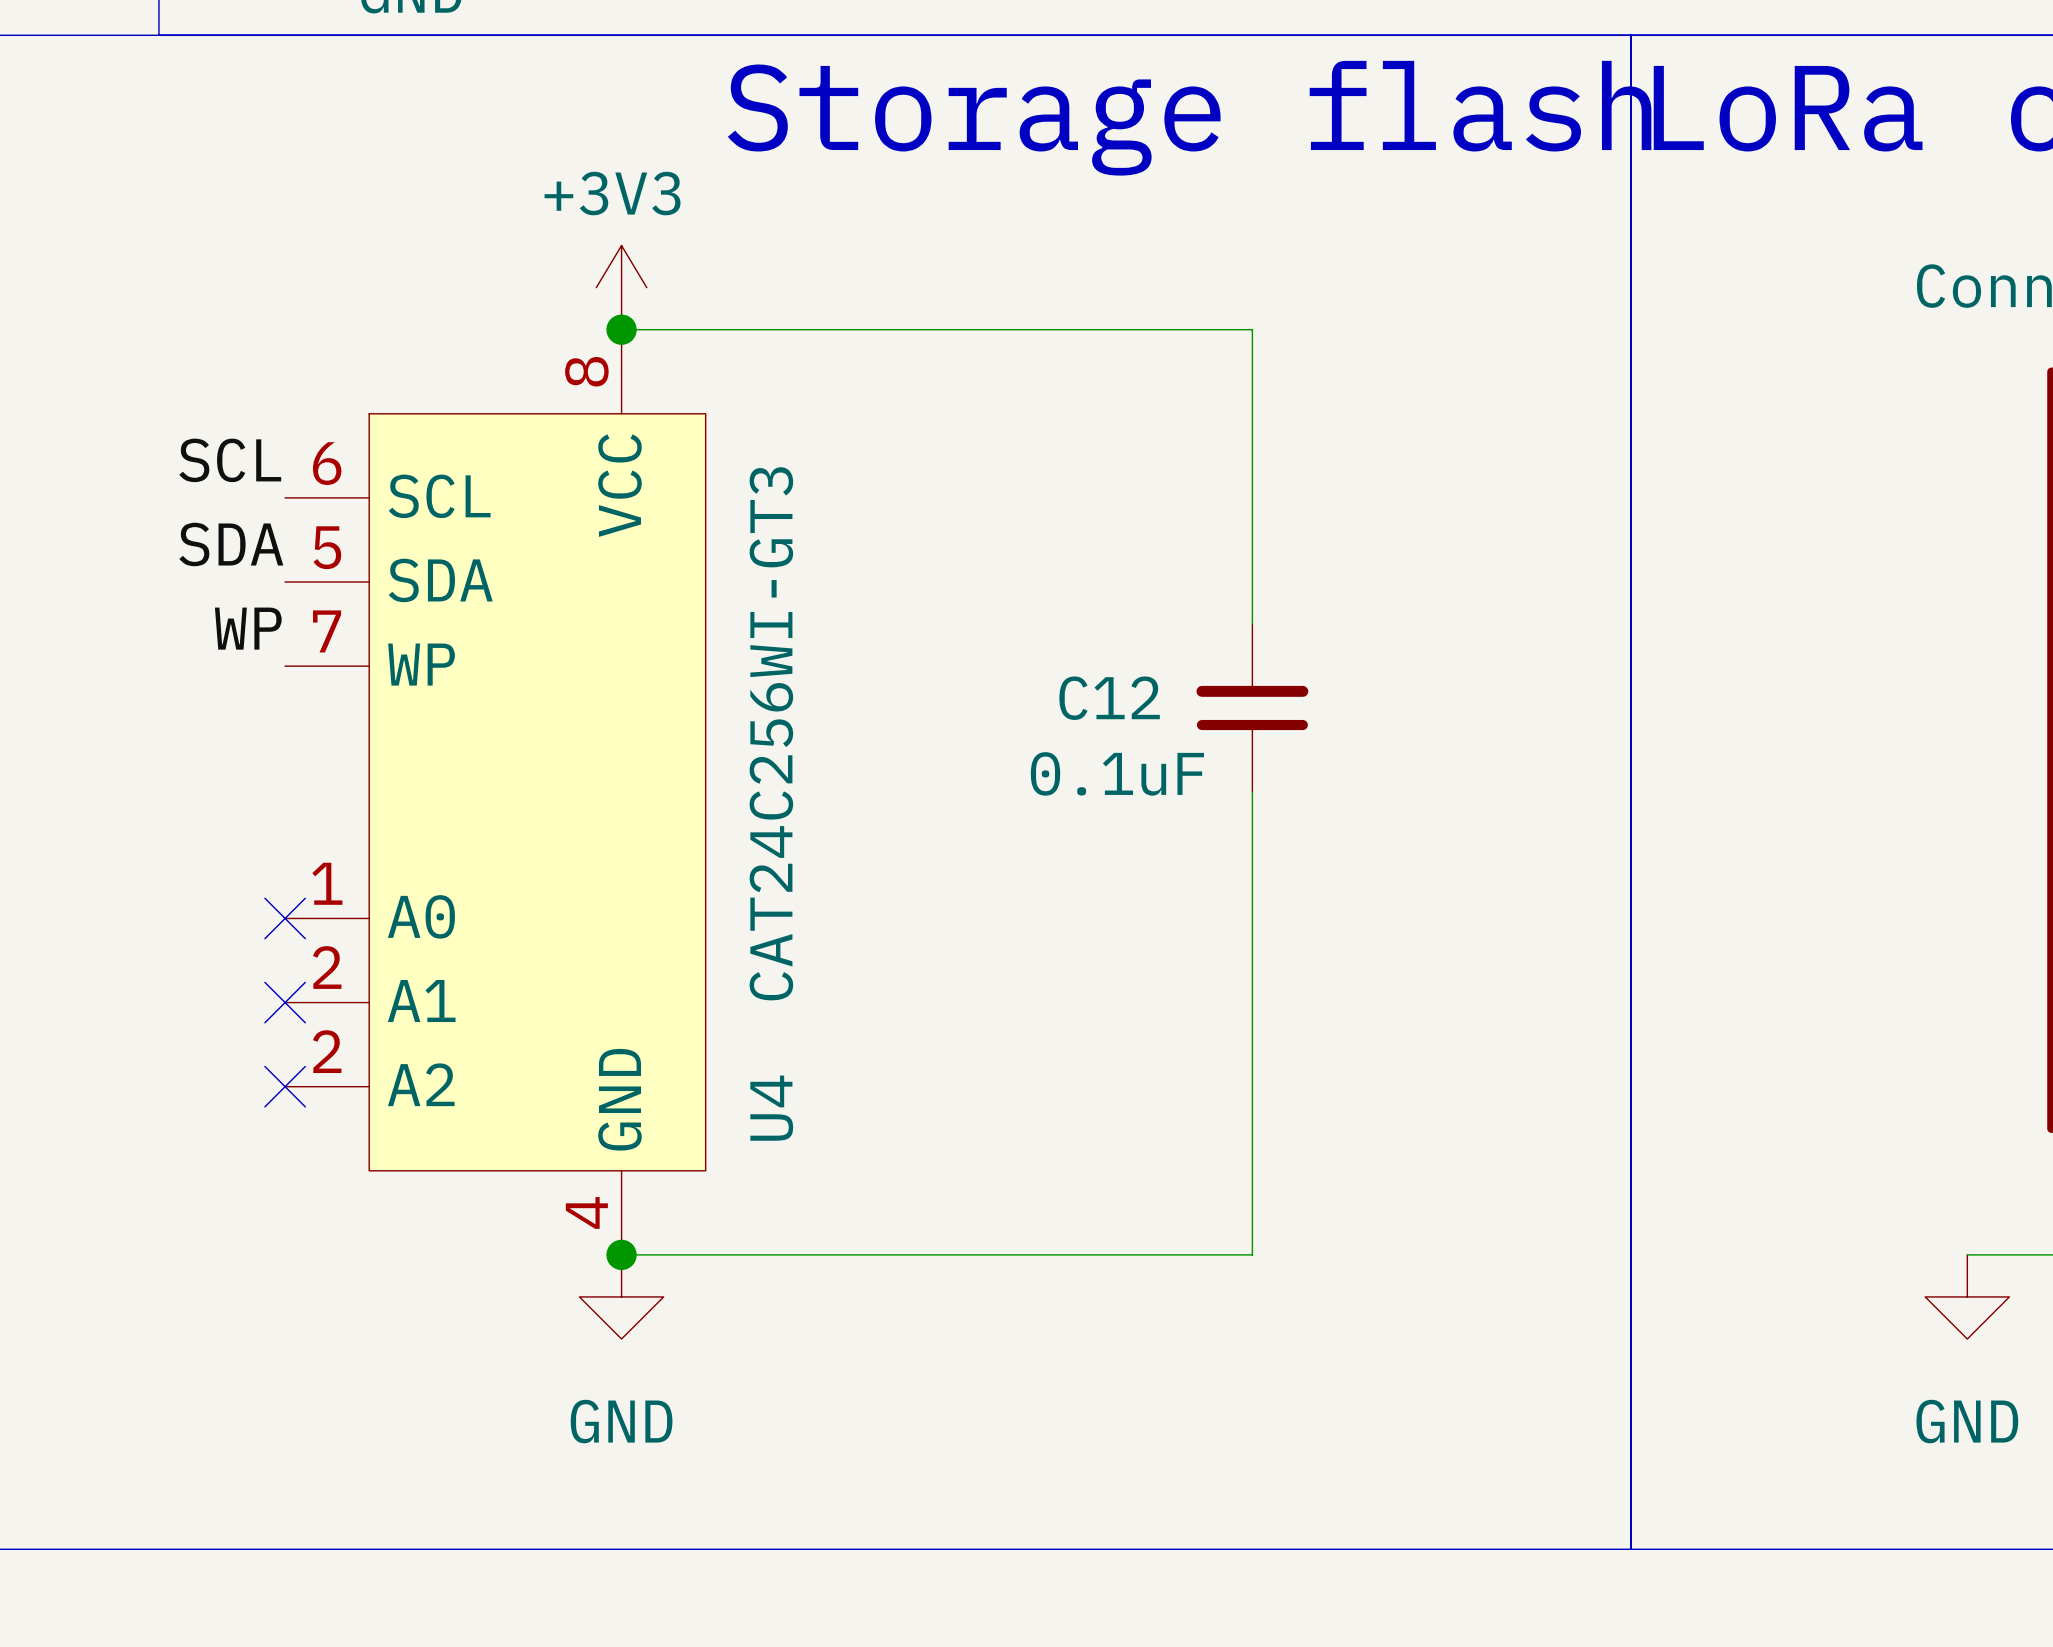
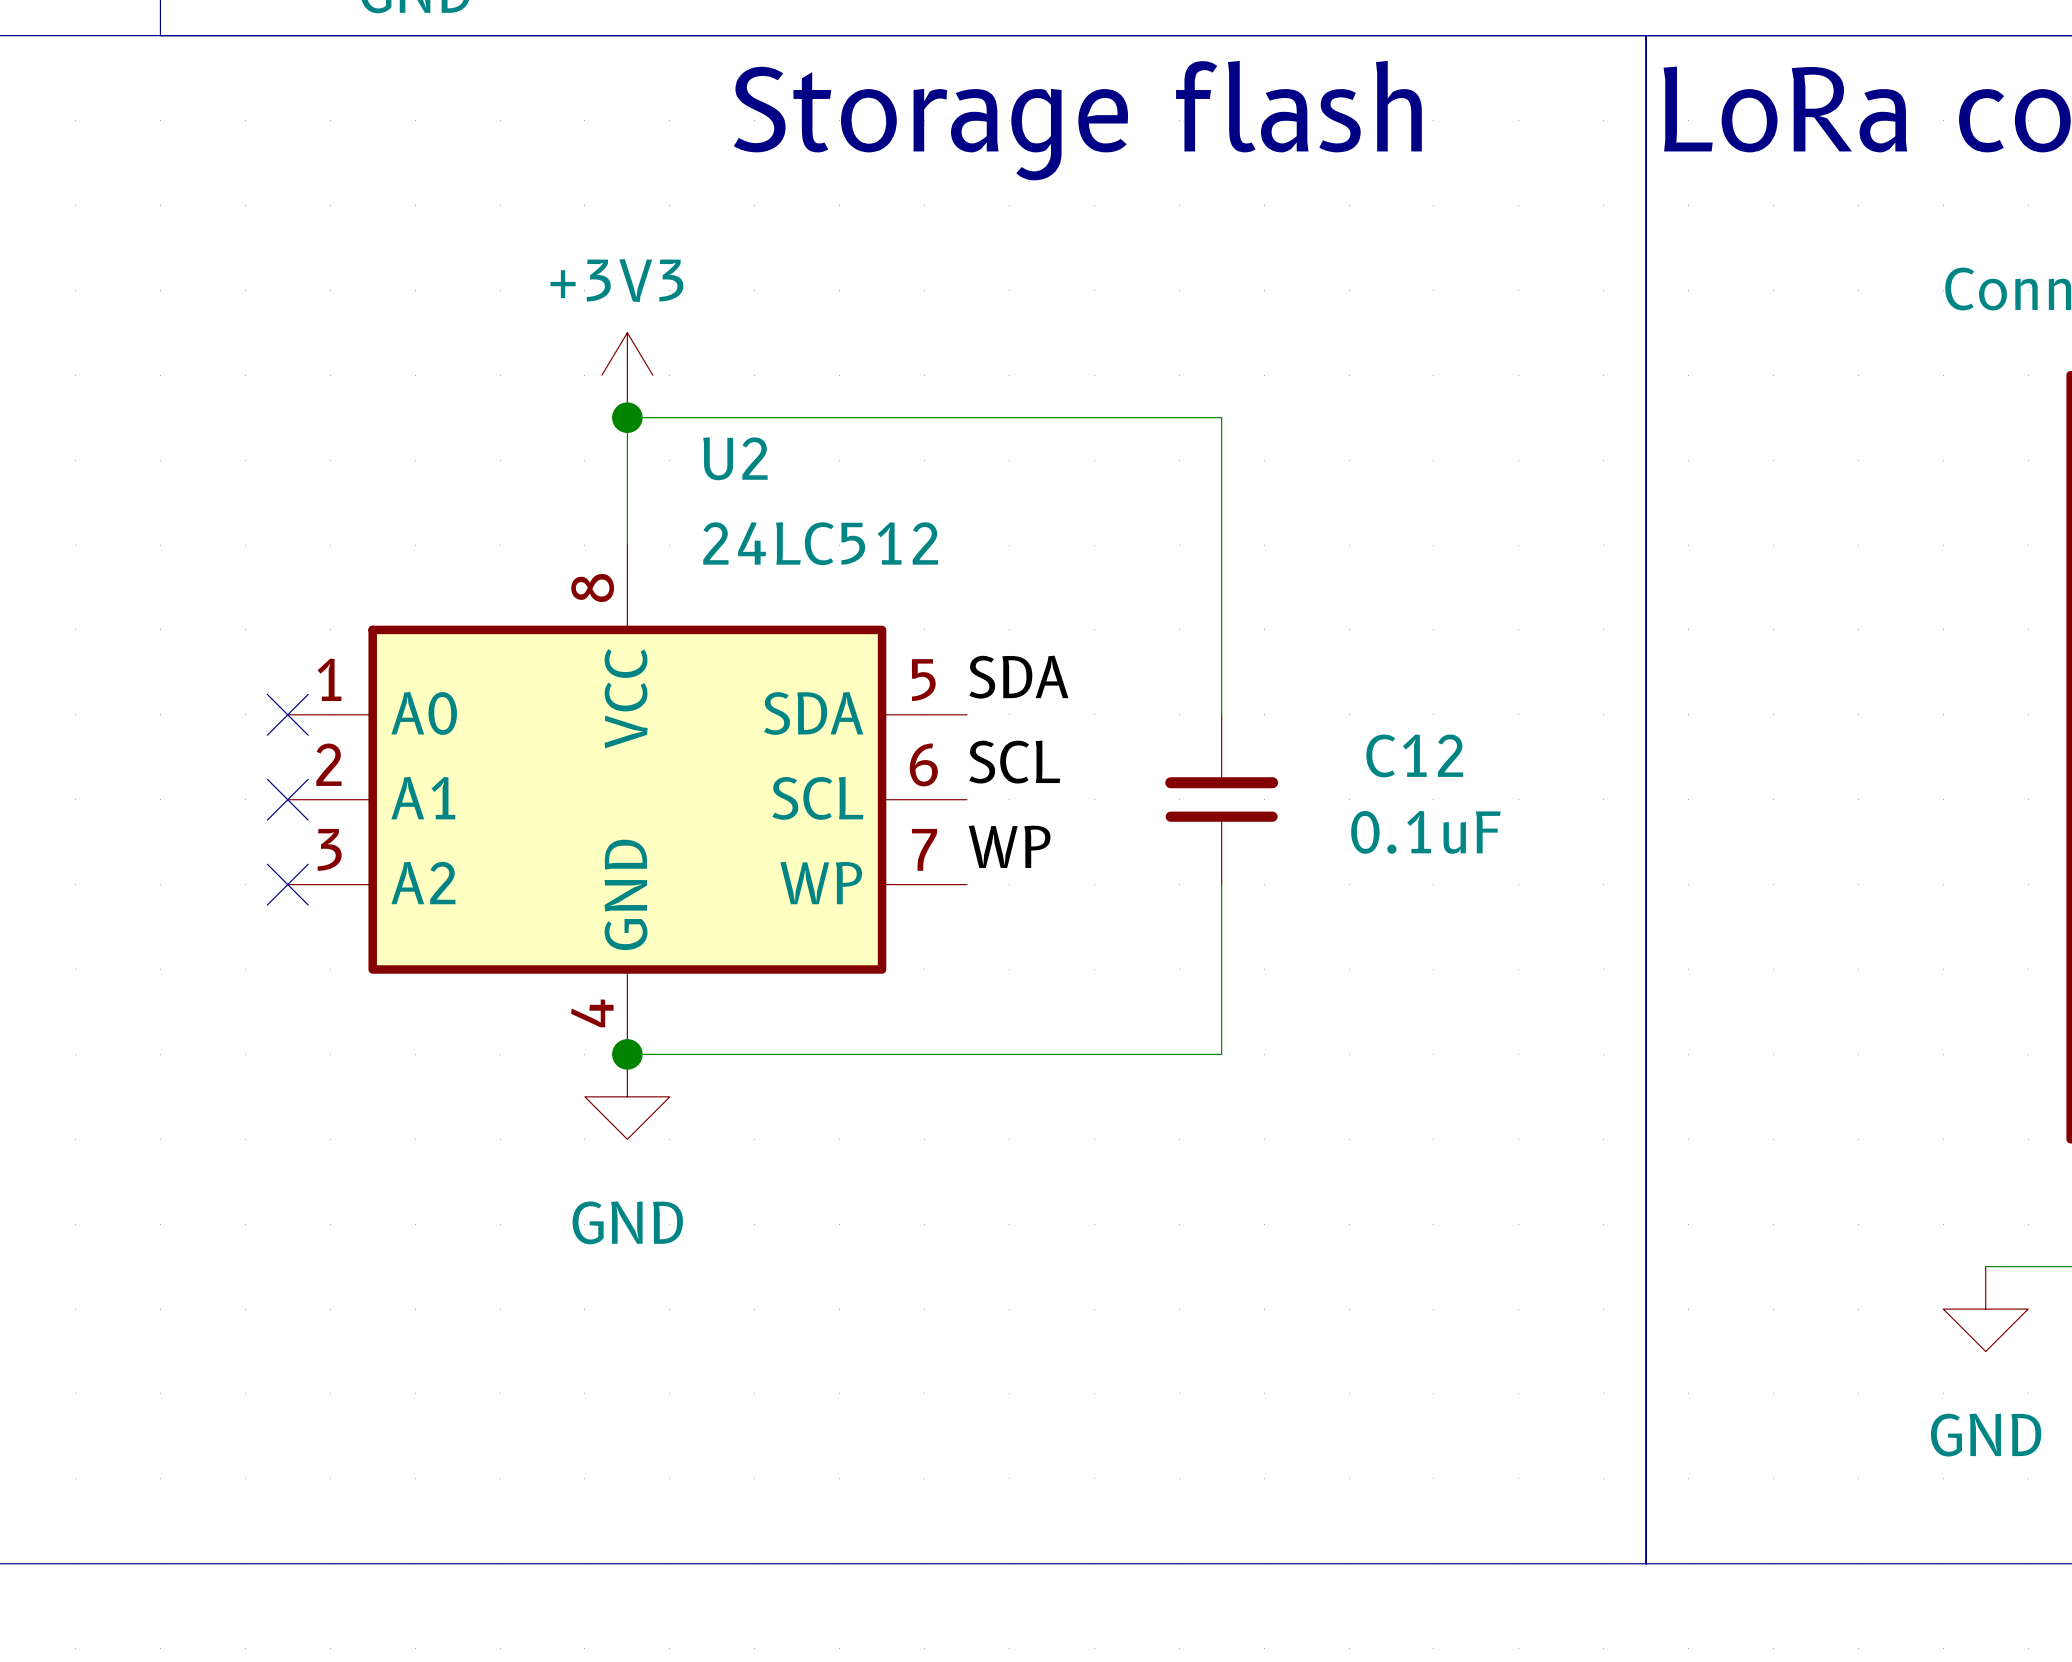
power symbol position: +3V3 (621, 287) -> +3V3 (627, 375)
wire: (621, 329) (1252, 329) (1252, 624) -> none
junction position: (621, 329) -> (627, 417)
label position: SCL (230, 460) -> SCL (1014, 762)
wire: none -> (627, 545) (627, 417) (1221, 417) (1221, 714)
label position: SDA (231, 544) -> SDA (1018, 677)
label position: WP (248, 628) -> WP (1009, 846)
C12 name position: C12 (1109, 698) -> C12 (1414, 755)
no-connect mark: none -> (287, 714)
C12 position: (1252, 708) -> (1221, 799)
C12 value position: 0.1uF (1117, 773) -> 0.1uF (1425, 832)
no-connect mark: none -> (287, 799)
U4: CAT24C256WI-GT3 (495, 792) -> none
U2: none -> 24LC512 (627, 799)
wire: (1252, 792) (1252, 1254) (621, 1254) -> none
wire: none -> (1221, 884) (1221, 1054) (627, 1054)
no-connect mark position: (285, 918) -> (287, 884)
no-connect mark: (285, 1002) -> none
junction: none -> (627, 1054)
no-connect mark: (285, 1086) -> none
junction: (621, 1254) -> none
power symbol position: GND (621, 1296) -> GND (627, 1096)

